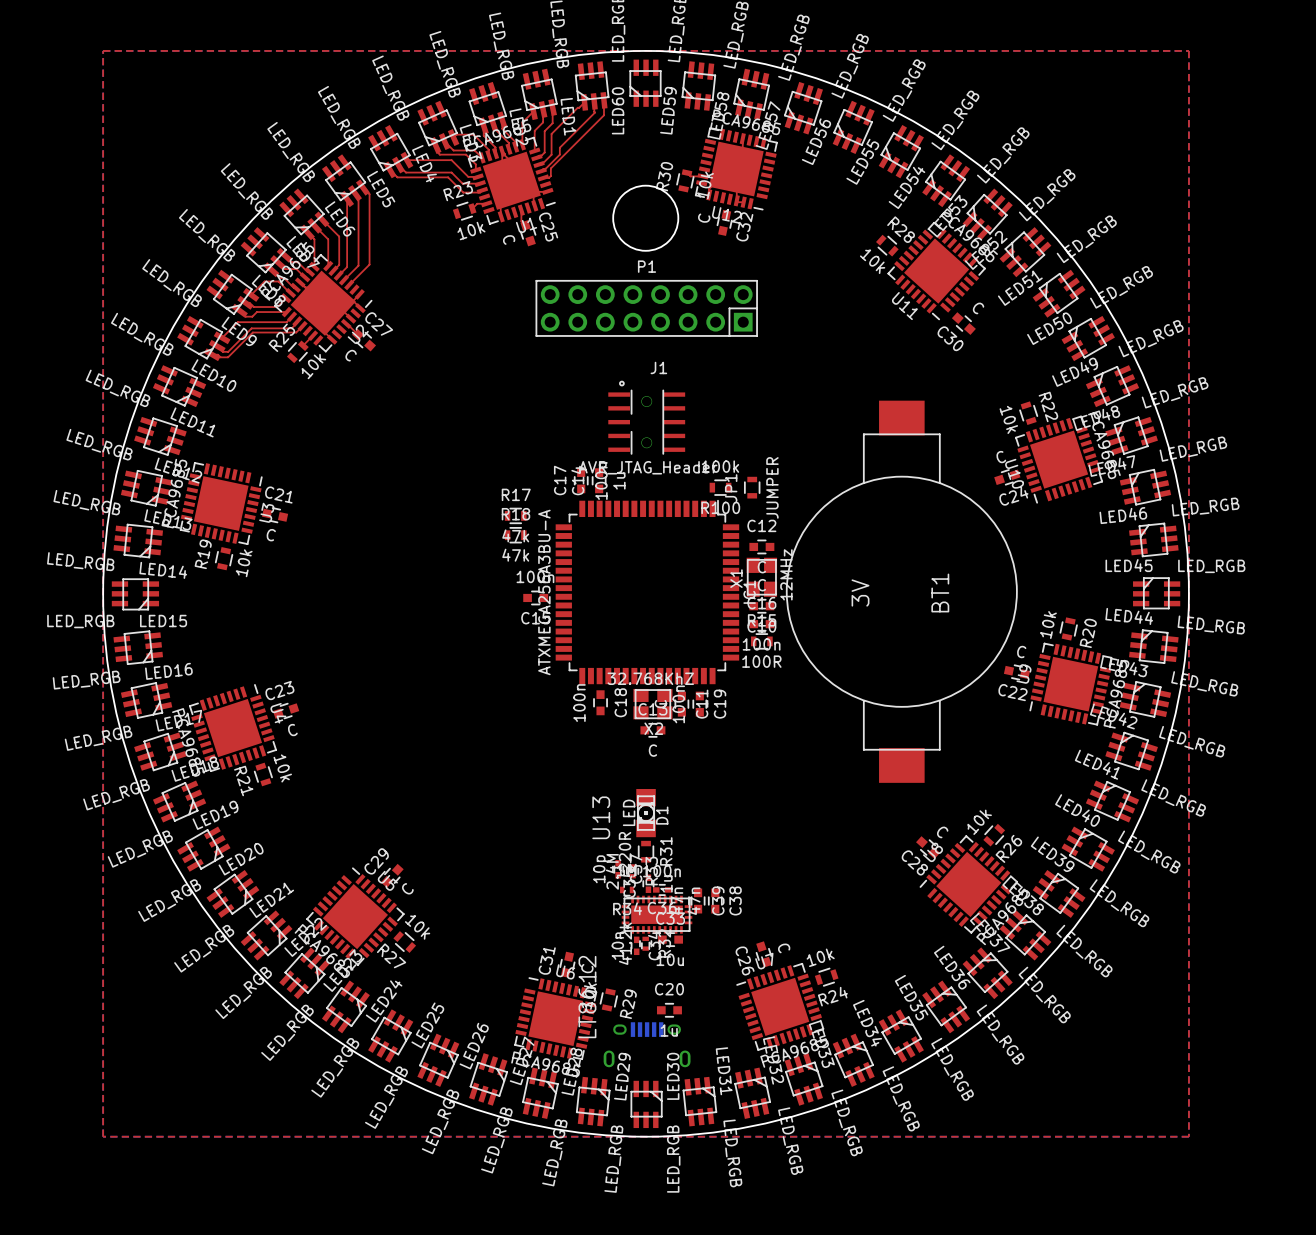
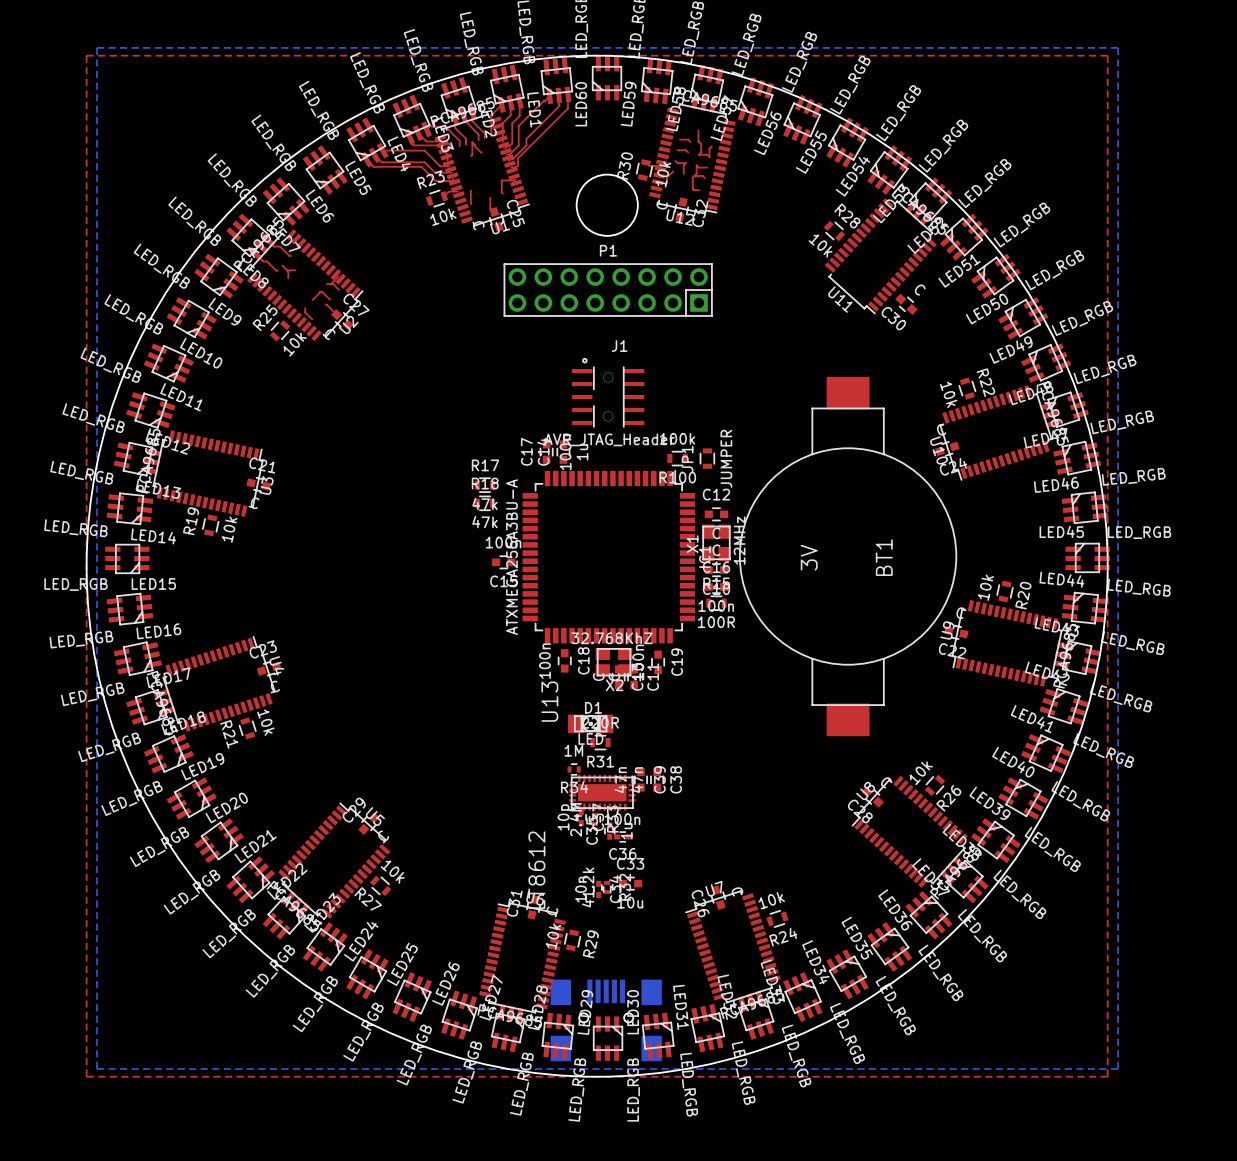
top zone outline: (103, 50) (1188, 50) (1188, 1136) (103, 1136) (103, 50) -> (86, 55) (1107, 55) (1107, 1076) (86, 1076) (86, 55)
U12 footprint: [694, 127, 778, 211] -> [649, 103, 736, 215]
U1 footprint: [467, 136, 556, 225] -> [434, 113, 530, 227]
top track: (362, 187) (369, 194) (369, 264) (349, 284) -> none
top track: (358, 196) (358, 265) (343, 280) -> none
top track: (347, 199) (347, 267) (338, 275) -> none
top track: (321, 219) (339, 236) (339, 265) (333, 270) -> none
U11 footprint: [887, 221, 986, 321] -> [824, 198, 937, 315]
top track: (314, 225) (328, 239) (328, 266) -> none
top track: (307, 232) (314, 239) (314, 266) -> none
U2 footprint: [274, 254, 373, 353] -> [247, 229, 364, 342]
top track: (278, 262) (284, 269) (296, 269) (305, 277) -> none
top track: (290, 293) (278, 281) (264, 281) (251, 294) -> none
top track: (286, 298) (277, 307) (253, 307) (249, 302) -> none
top track: (239, 310) (245, 316) (252, 316) (256, 312) (286, 312) -> none
top track: (292, 316) (286, 322) (237, 322) (222, 337) -> none
top track: (297, 321) (291, 328) (251, 328) (228, 351) (222, 351) -> none
top track: (302, 326) (296, 332) (252, 332) (228, 357) (212, 354) -> none
top track: (313, 335) (303, 345) -> none
U10 footprint: [1015, 415, 1104, 504] -> [939, 385, 1053, 481]
U3 footprint: [179, 462, 263, 545] -> [152, 430, 264, 517]
round board edge position: (646, 593) -> (597, 566)
U9 footprint: [1029, 642, 1113, 726] -> [951, 600, 1063, 687]
U4 footprint: [189, 684, 277, 772] -> [162, 636, 276, 732]
C11 position: (681, 704) -> (634, 677)
C13 rotation: 0° (652, 730) -> 90° clockwise (618, 677)
D1 rotation: 0° (646, 813) -> 90° counterclockwise (590, 723)
D1 position: (646, 813) -> (590, 723)
U8 footprint: [919, 835, 1018, 934] -> [851, 775, 968, 888]
R31 rotation: 0° (646, 851) -> 90° clockwise (600, 742)
R31 position: (646, 851) -> (600, 742)
U5 footprint: [306, 867, 405, 966] -> [278, 802, 391, 919]
R34 position: (627, 889) -> (574, 769)
C39 position: (698, 900) -> (640, 779)
C38 position: (715, 900) -> (657, 779)
U13 position: (657, 914) -> (602, 792)
U7 footprint: [736, 962, 825, 1051] -> [685, 890, 781, 1004]
U6 footprint: [514, 977, 598, 1061] -> [479, 902, 566, 1014]
C20: 1u (669, 1010) -> none
part: (647, 1044) -> none
part: none -> (606, 1020)

